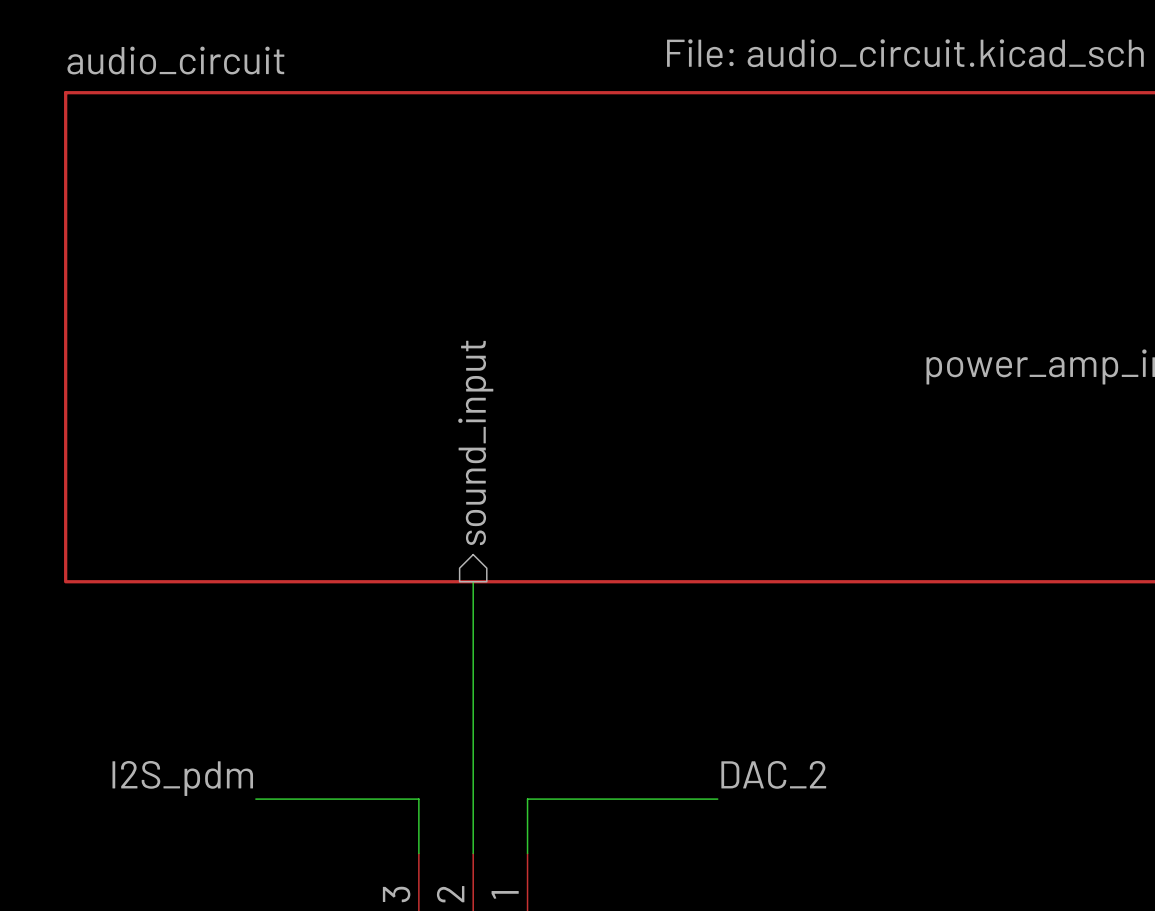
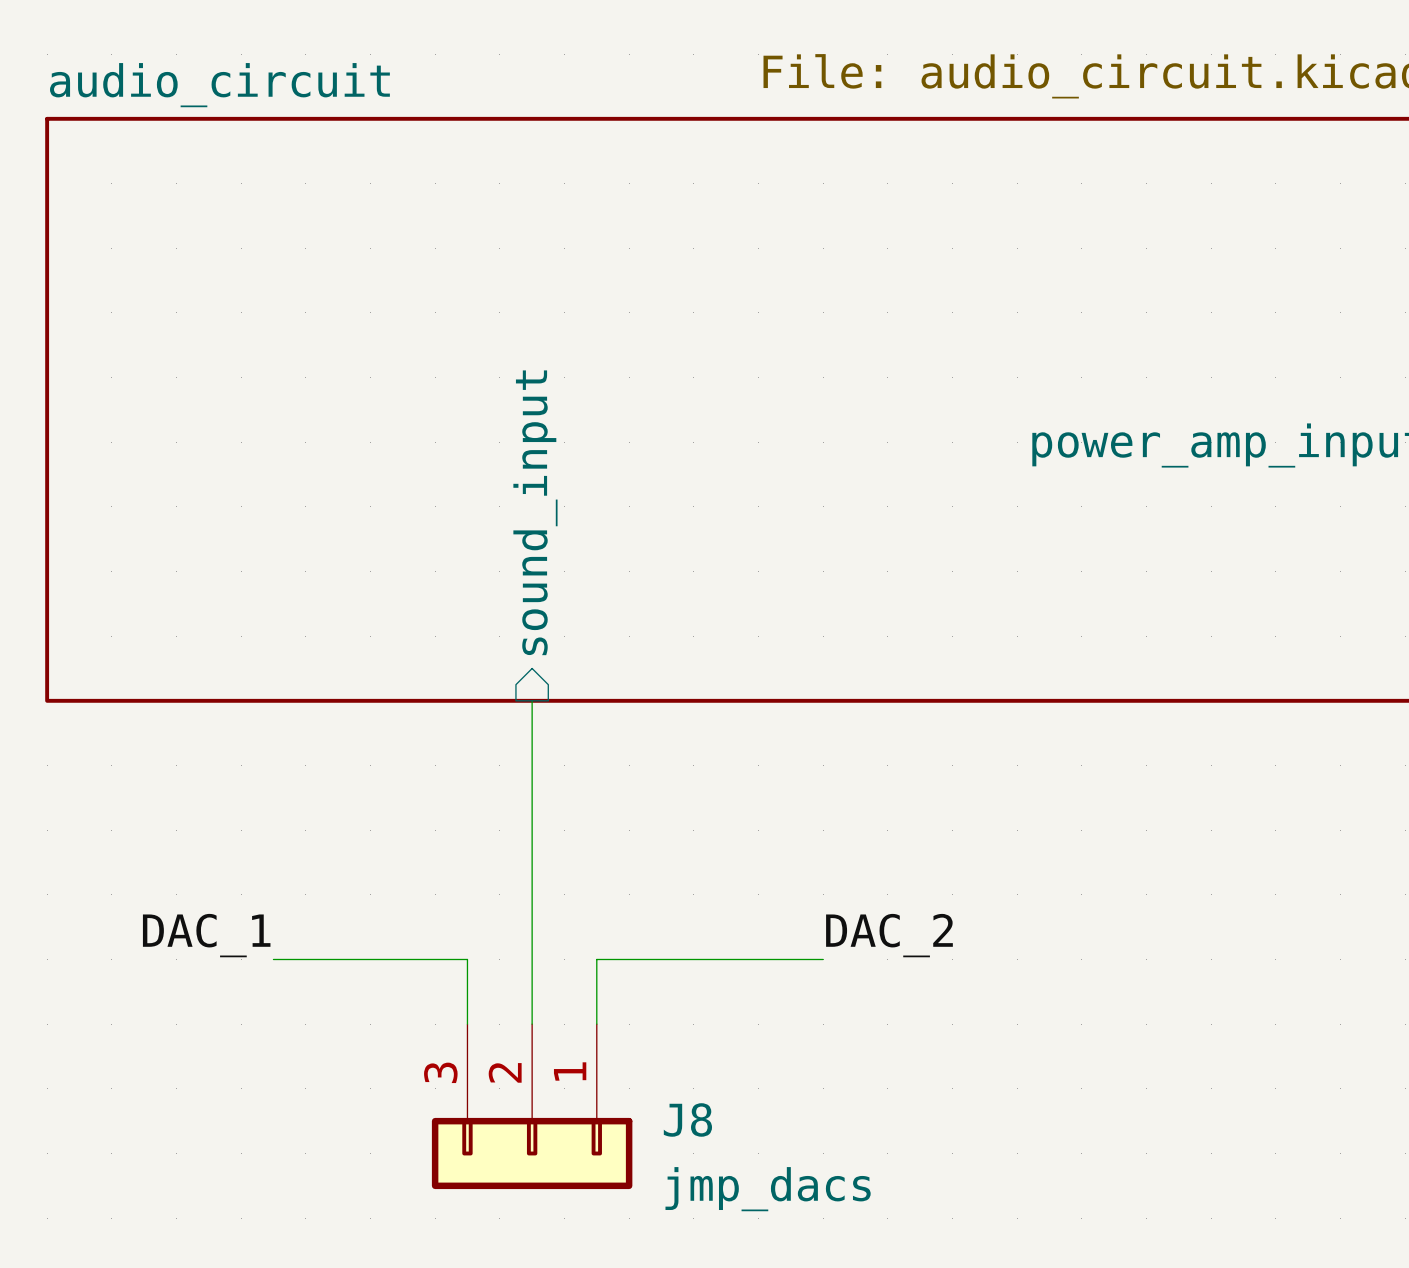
label: I2S_pdm (182, 778) -> DAC_1 (206, 935)

